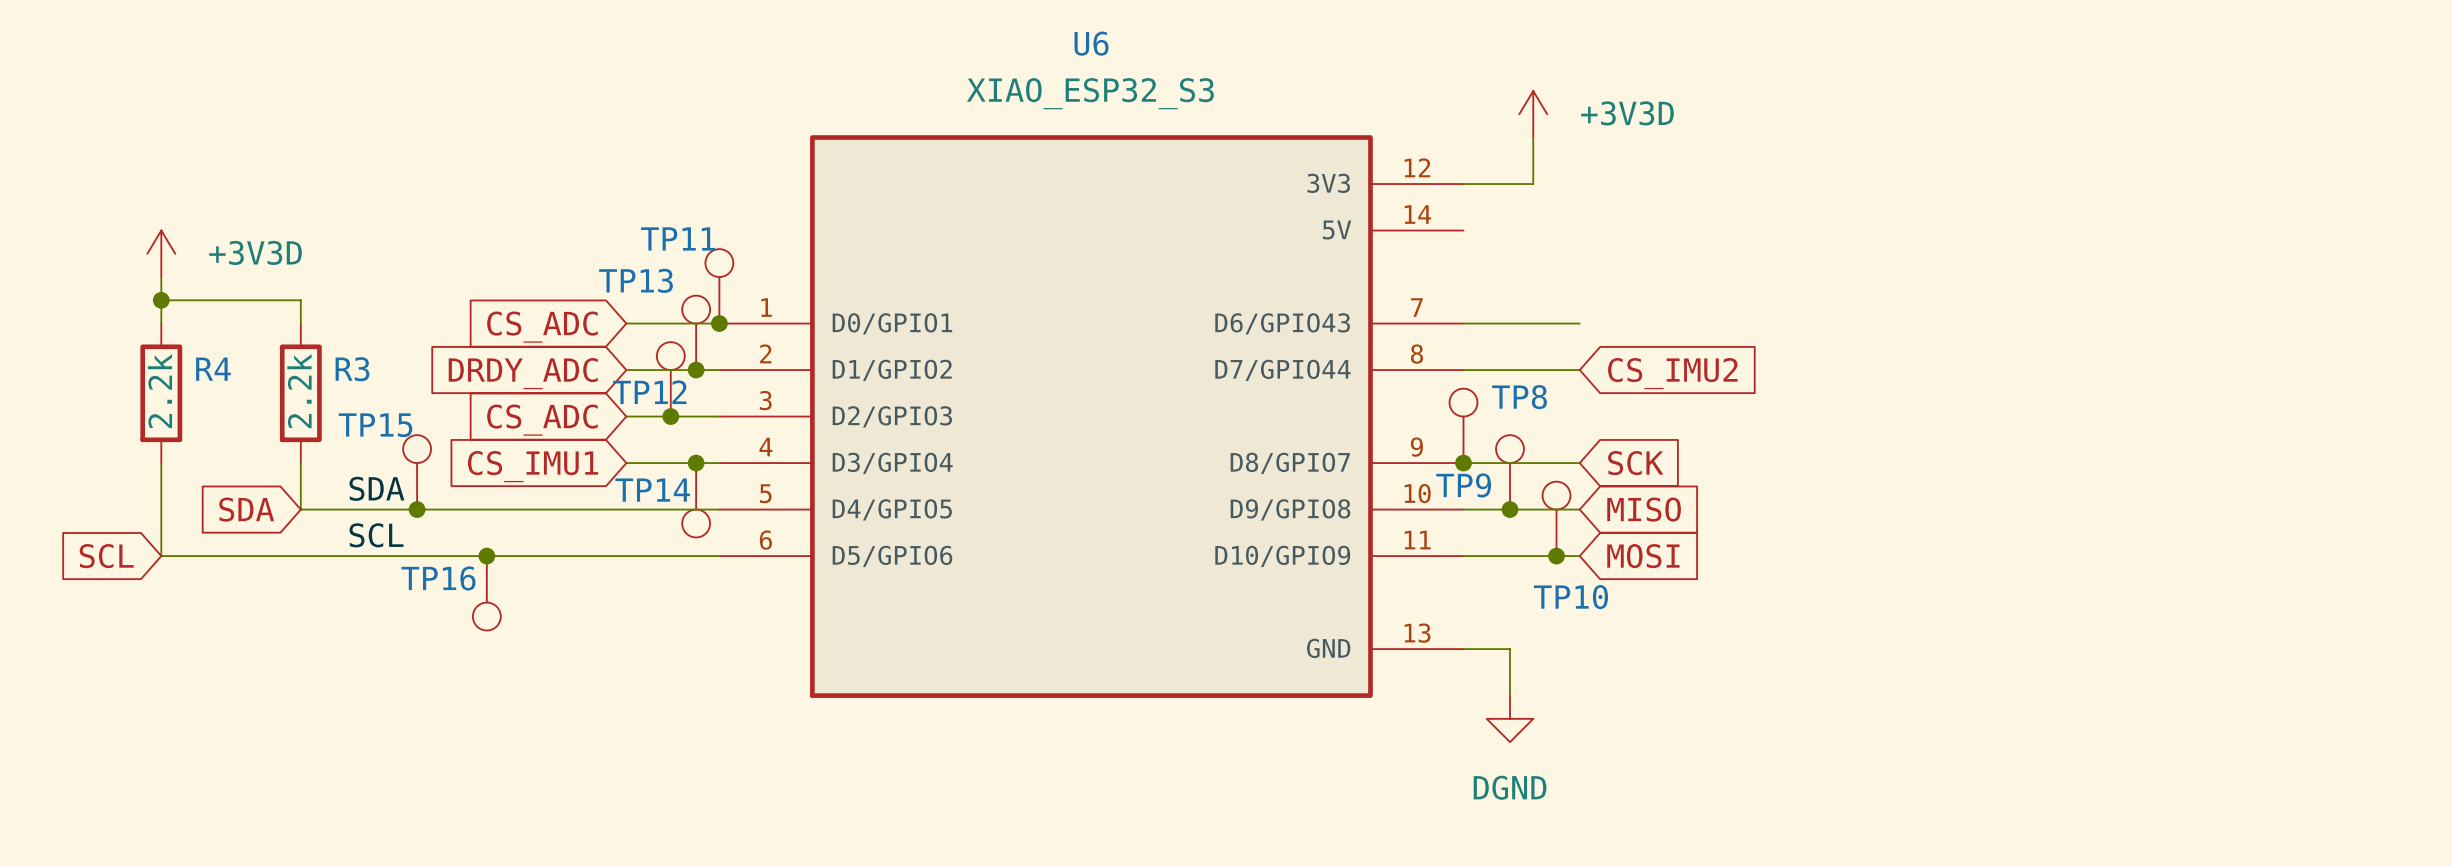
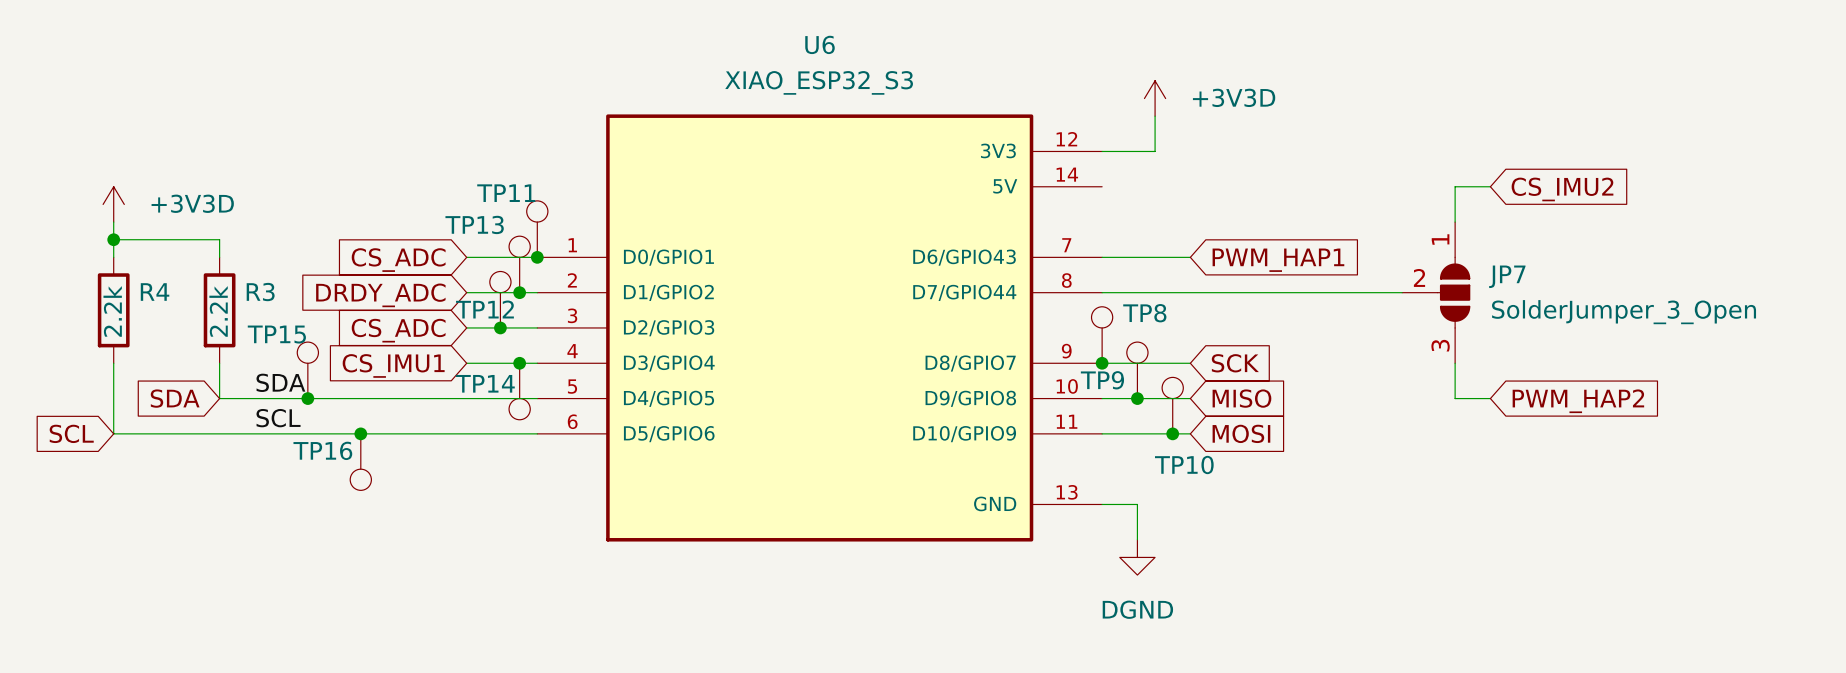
wire: none -> (1490, 186) (1455, 186) (1455, 222)
global label: none -> PWM_HAP1 (1278, 260)
wire: none -> (1190, 292) (1402, 292)
JP7: none -> SolderJumper_3_Open (1436, 292)
global label position: CS_IMU2 (1672, 373) -> CS_IMU2 (1562, 189)
wire: none -> (1455, 363) (1455, 398) (1490, 398)
global label: none -> PWM_HAP2 (1578, 401)

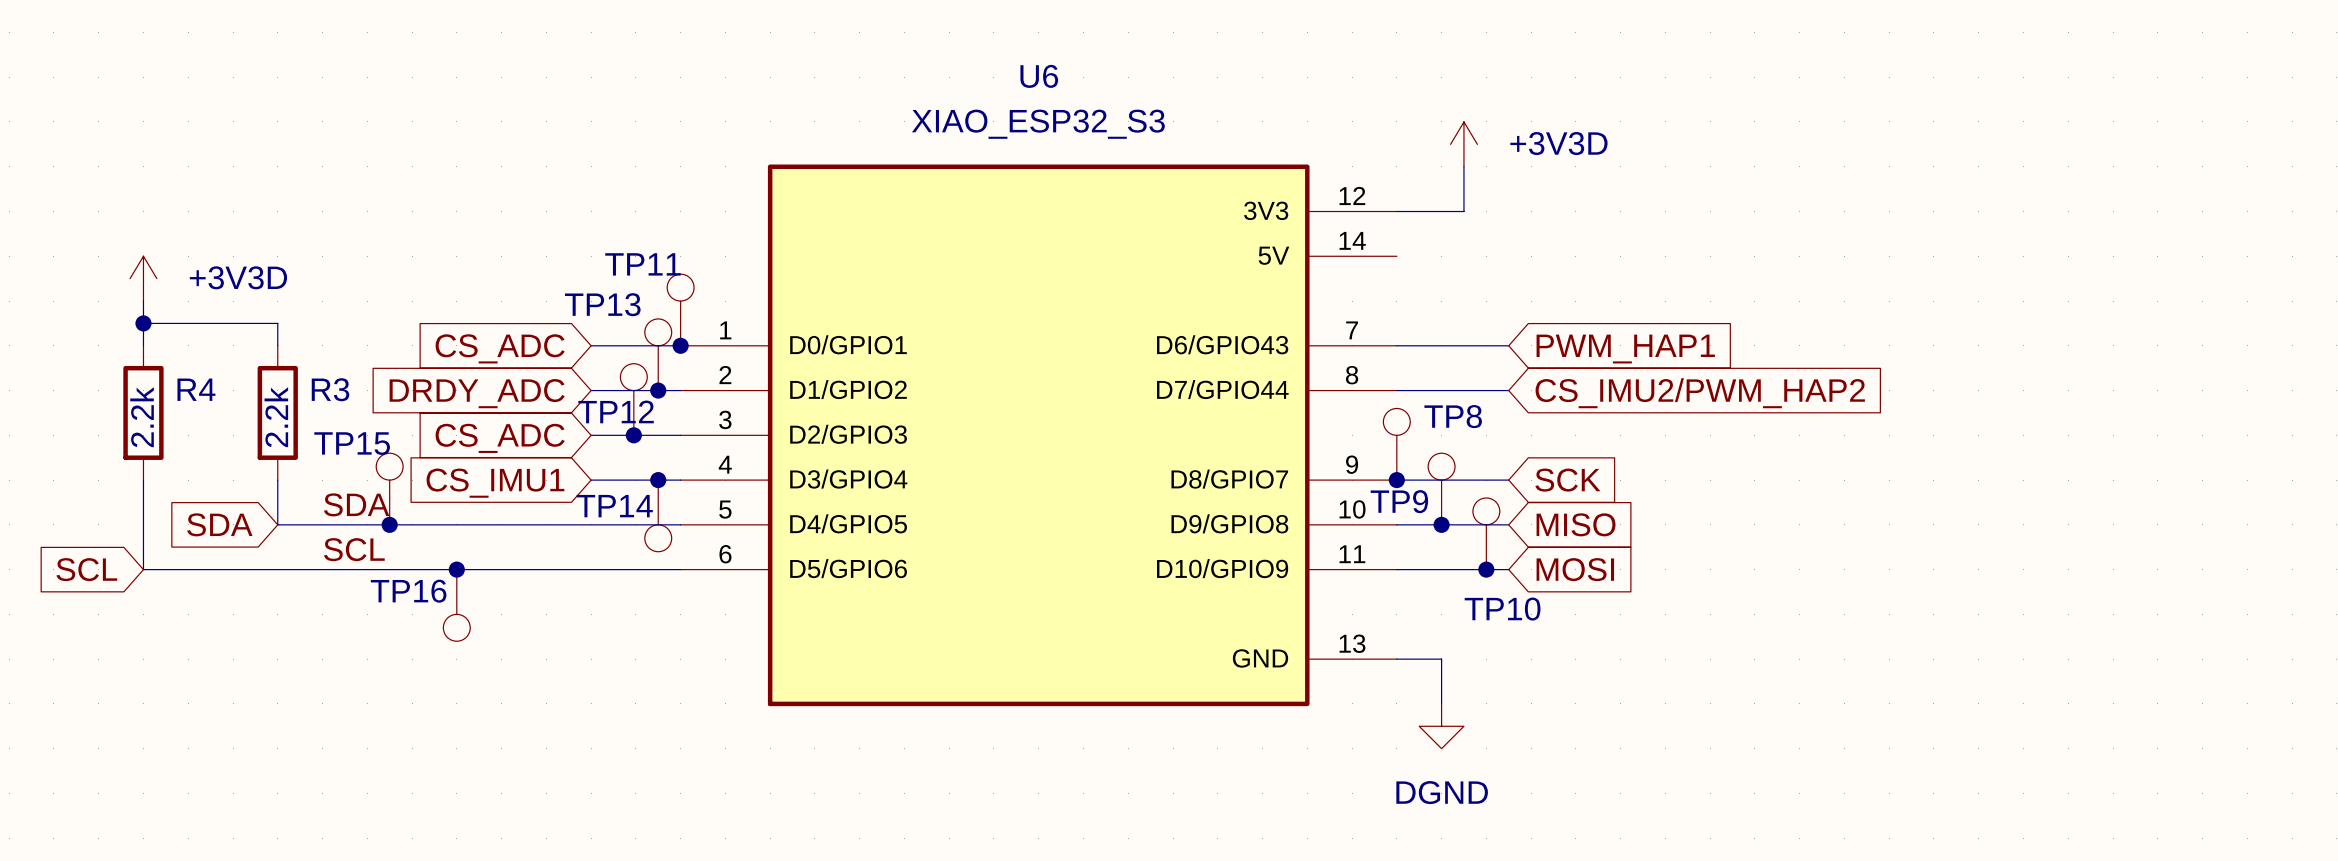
wire: (1490, 186) (1455, 186) (1455, 222) -> none
global label: CS_IMU2 (1562, 189) -> none
wire: (1190, 292) (1402, 292) -> none
JP7: SolderJumper_3_Open (1436, 292) -> none
global label: none -> CS_IMU2/PWM_HAP2 (1700, 393)
wire: (1455, 363) (1455, 398) (1490, 398) -> none
global label: PWM_HAP2 (1578, 401) -> none

